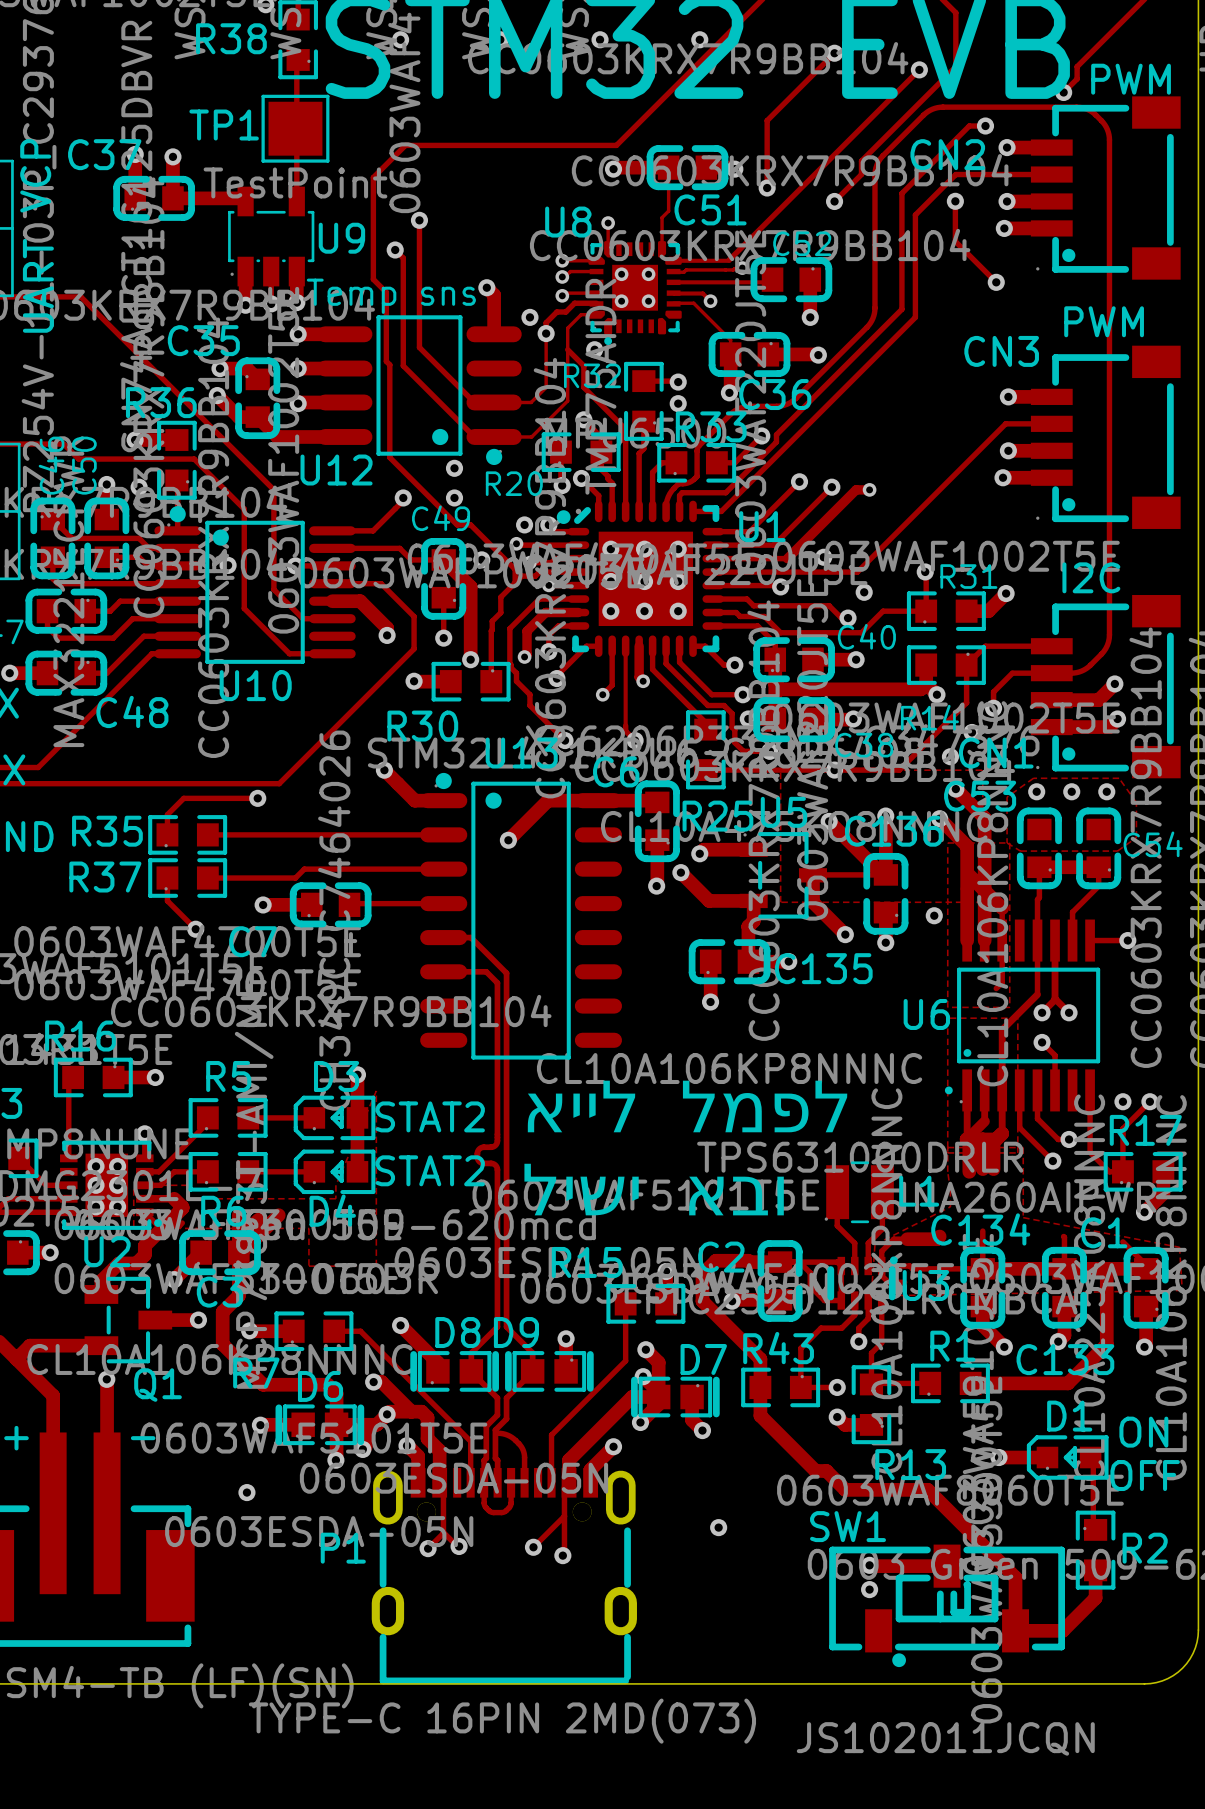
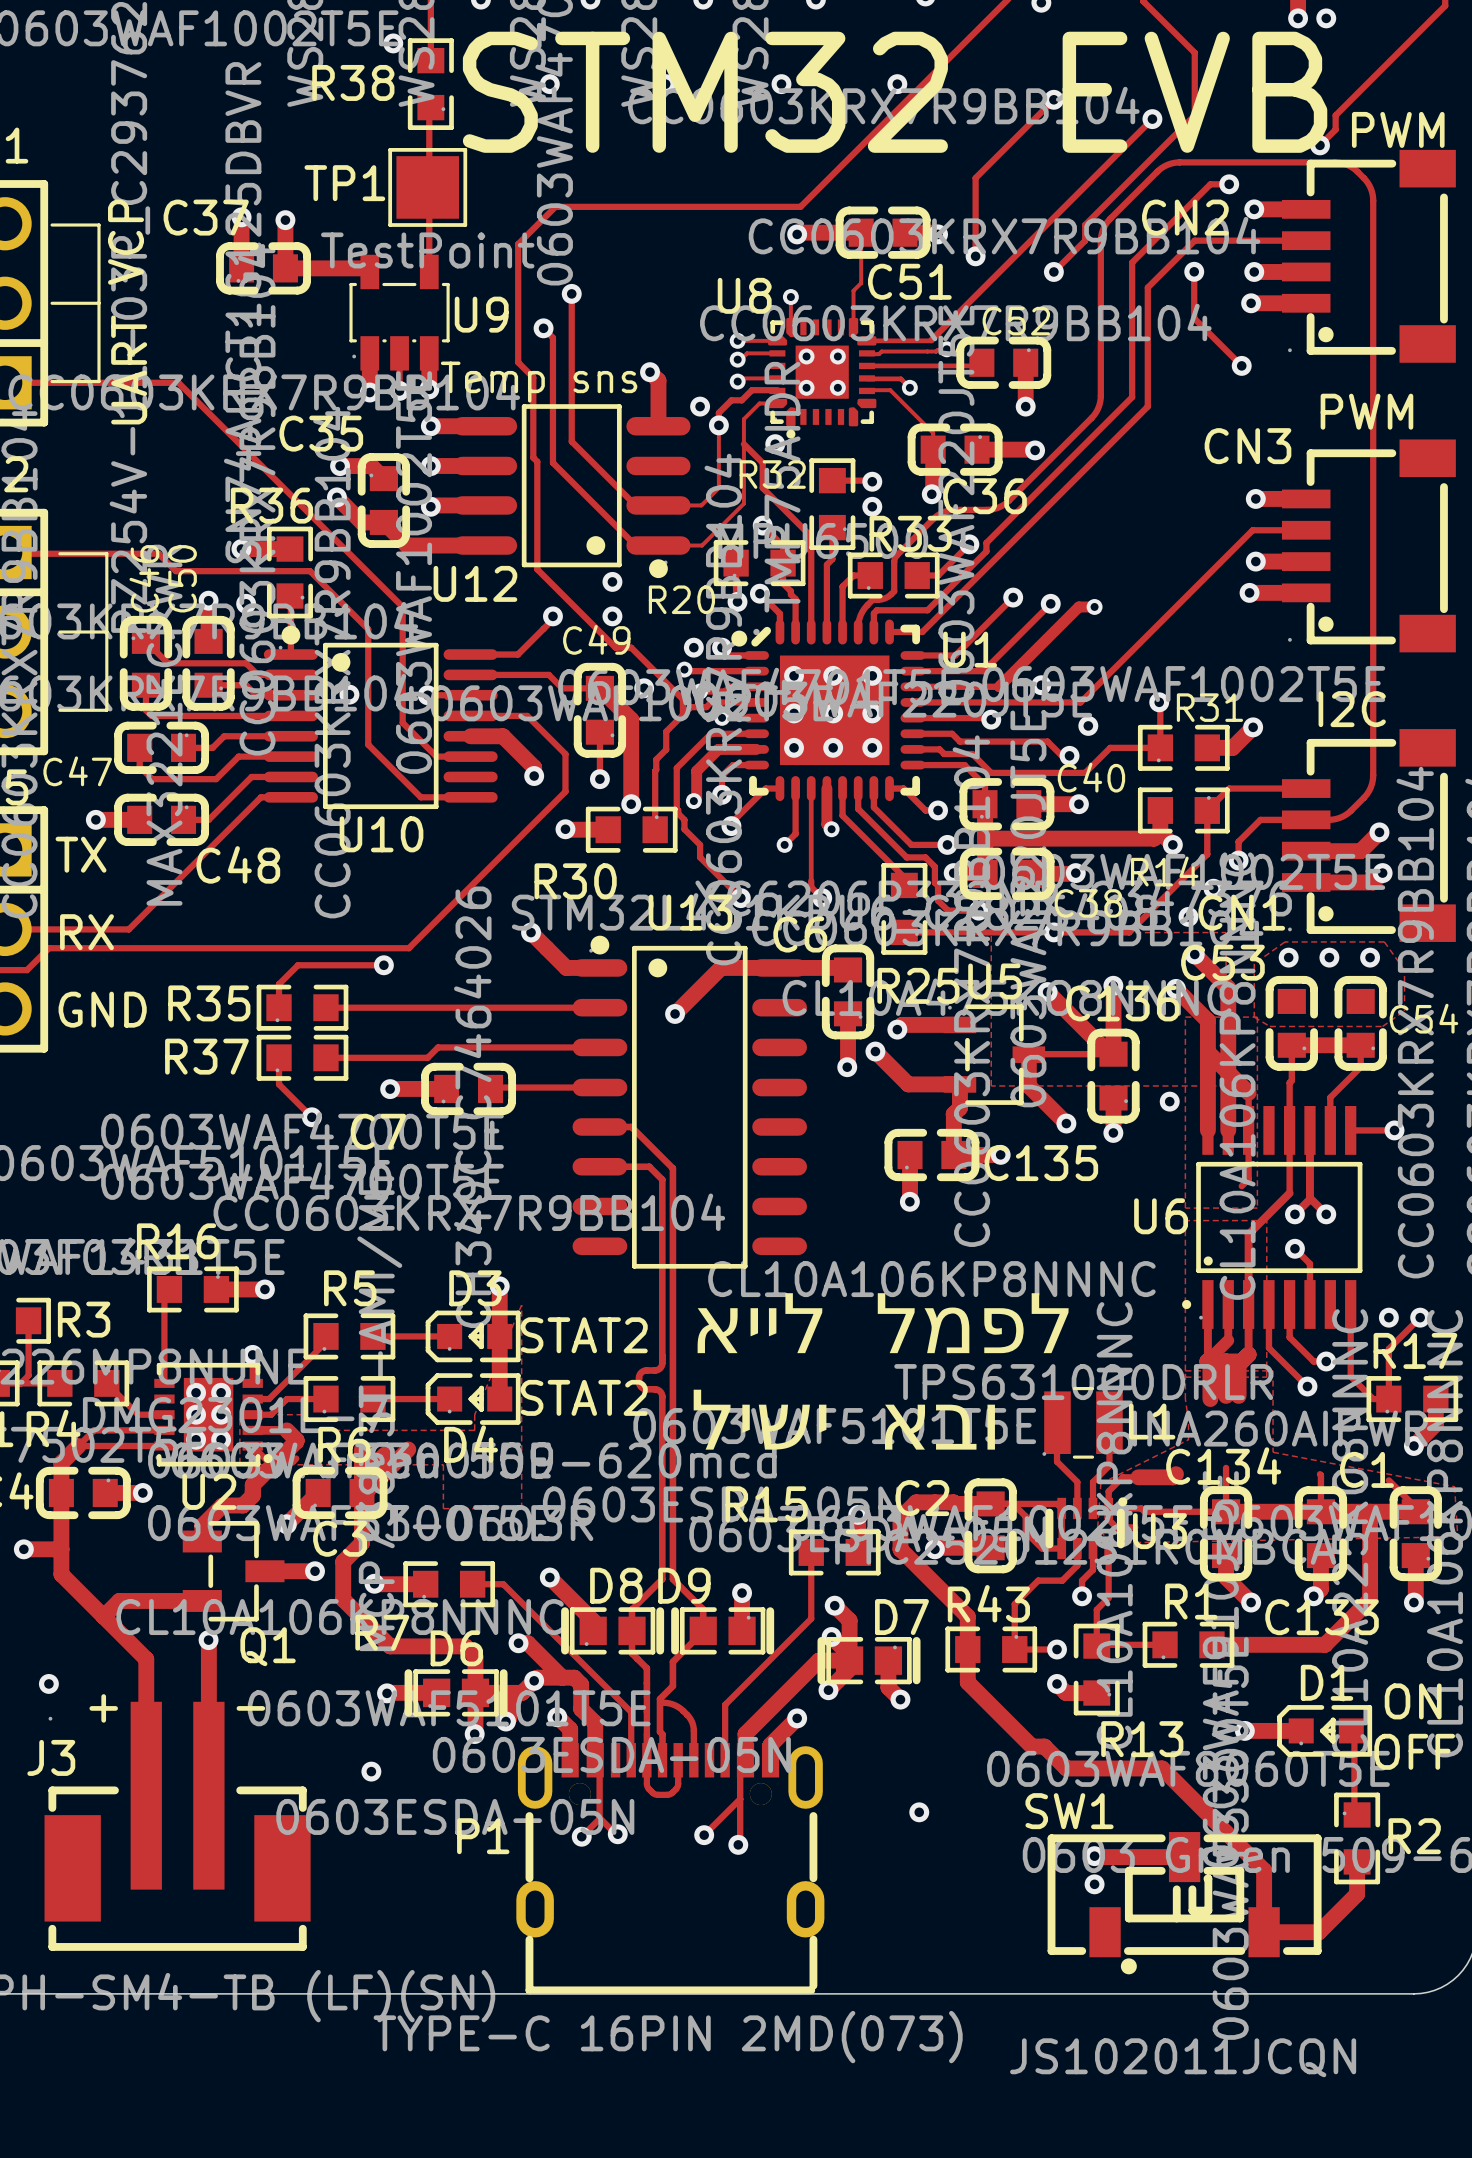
track: (471, 1371) (497, 1398) (497, 1415) (486, 1426) (486, 1458) (484, 1460) -> (632, 1631) (632, 1653) (646, 1668) (646, 1734)

